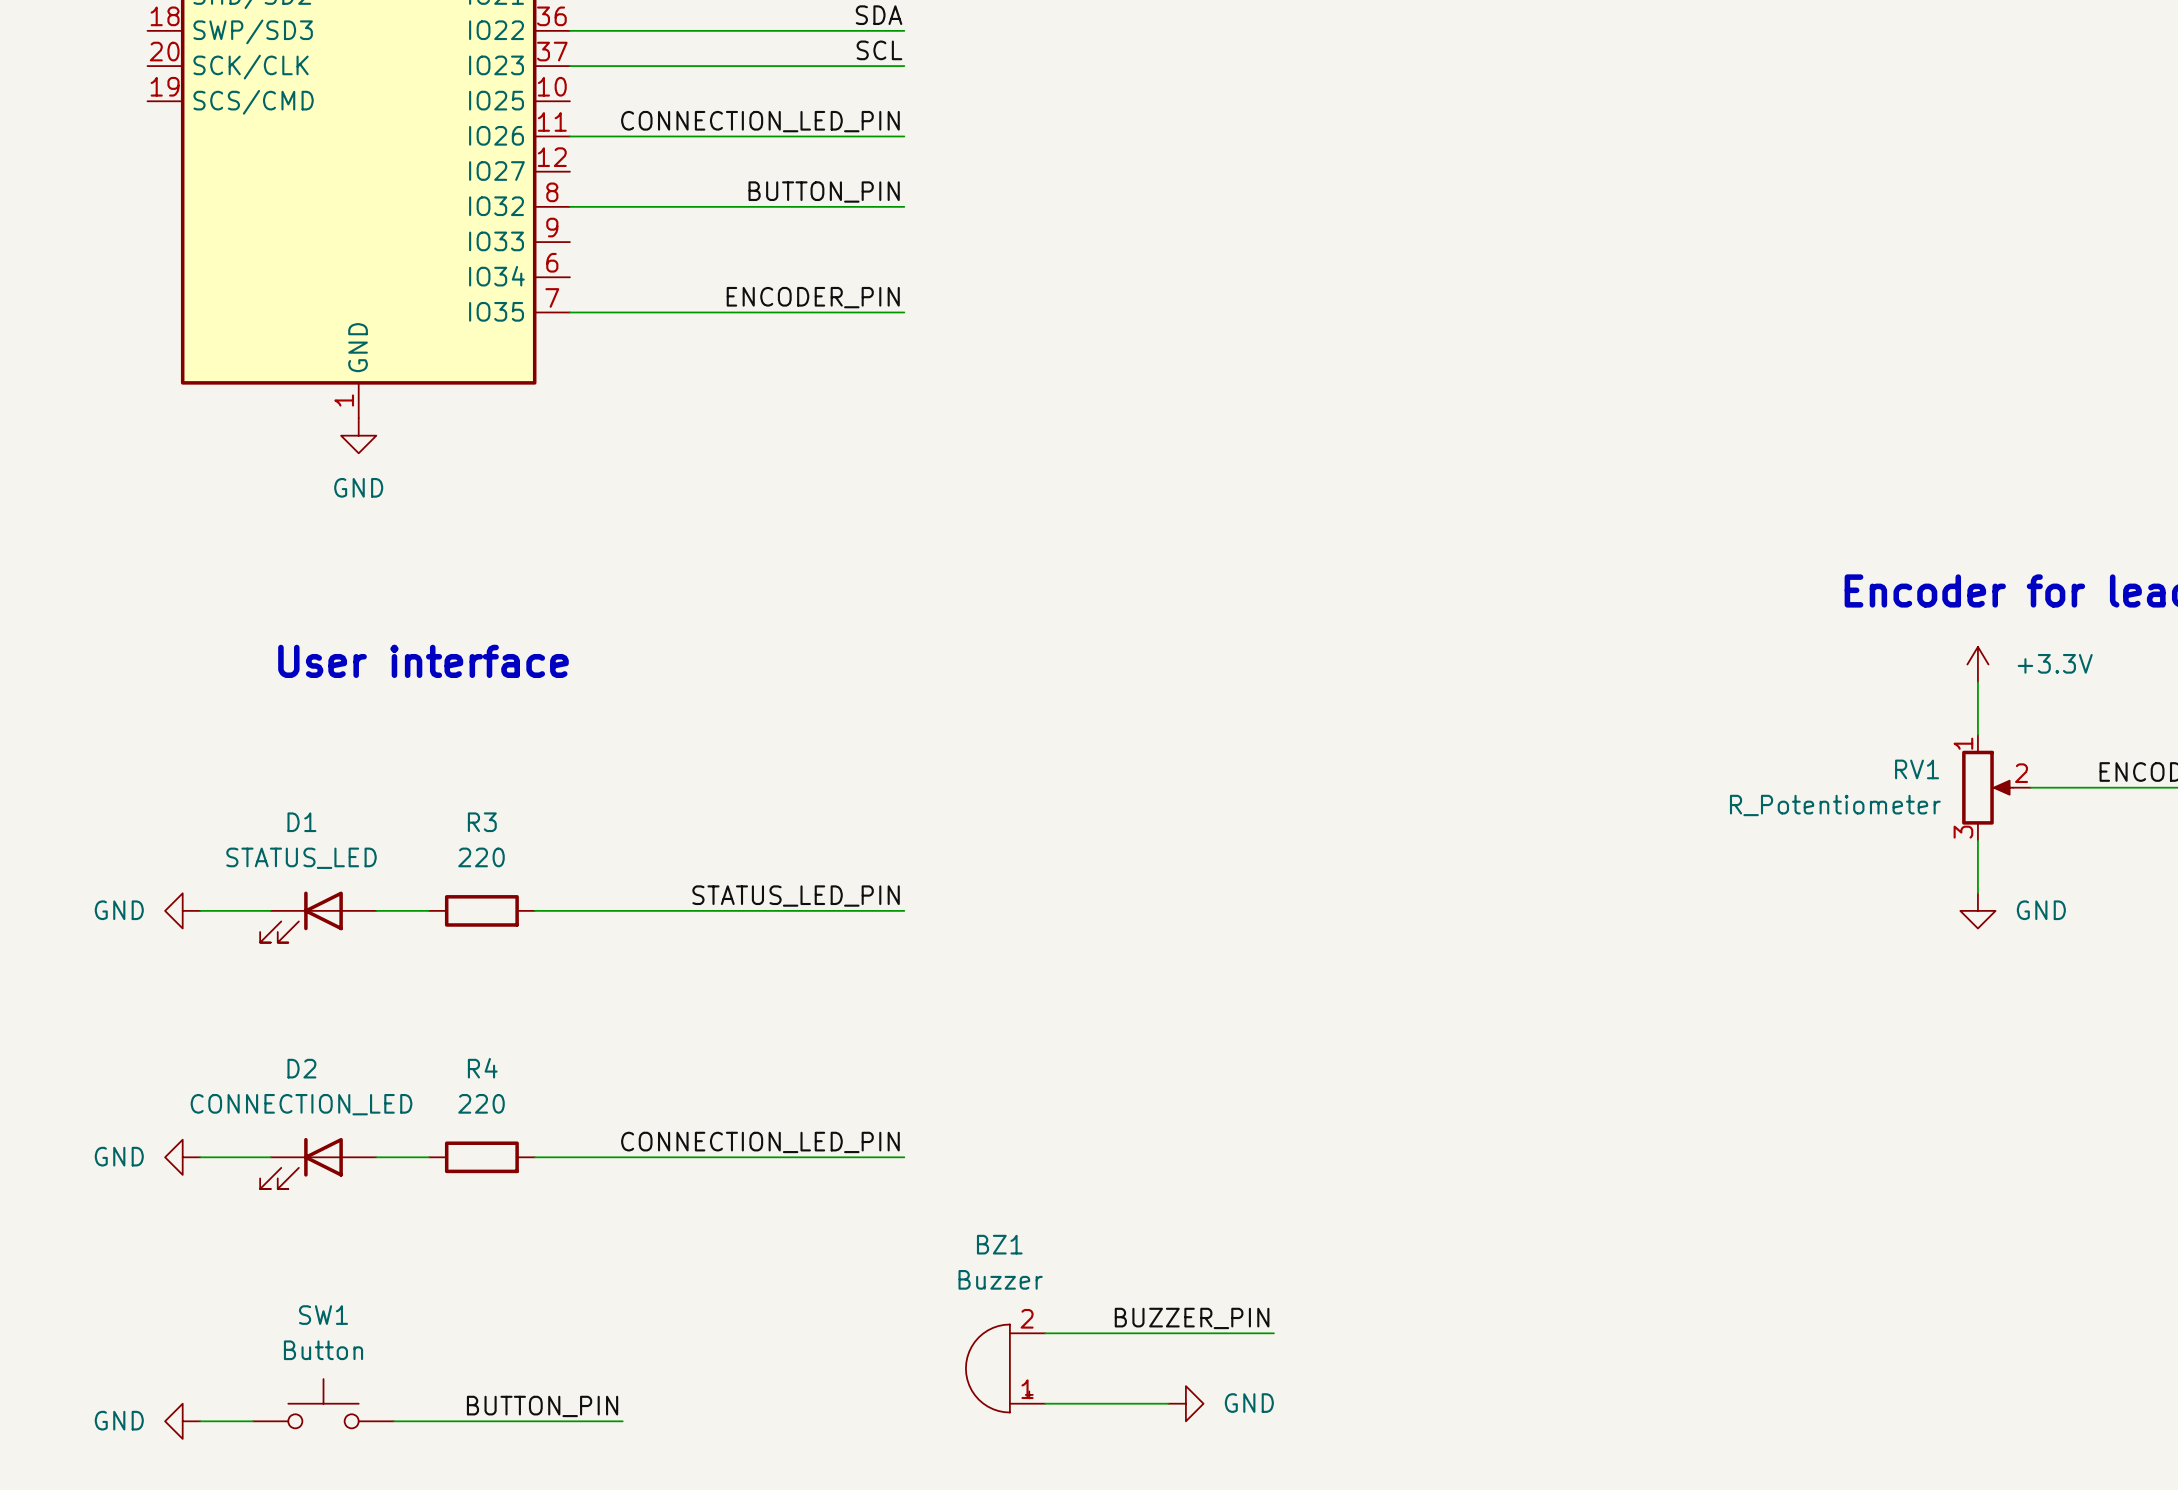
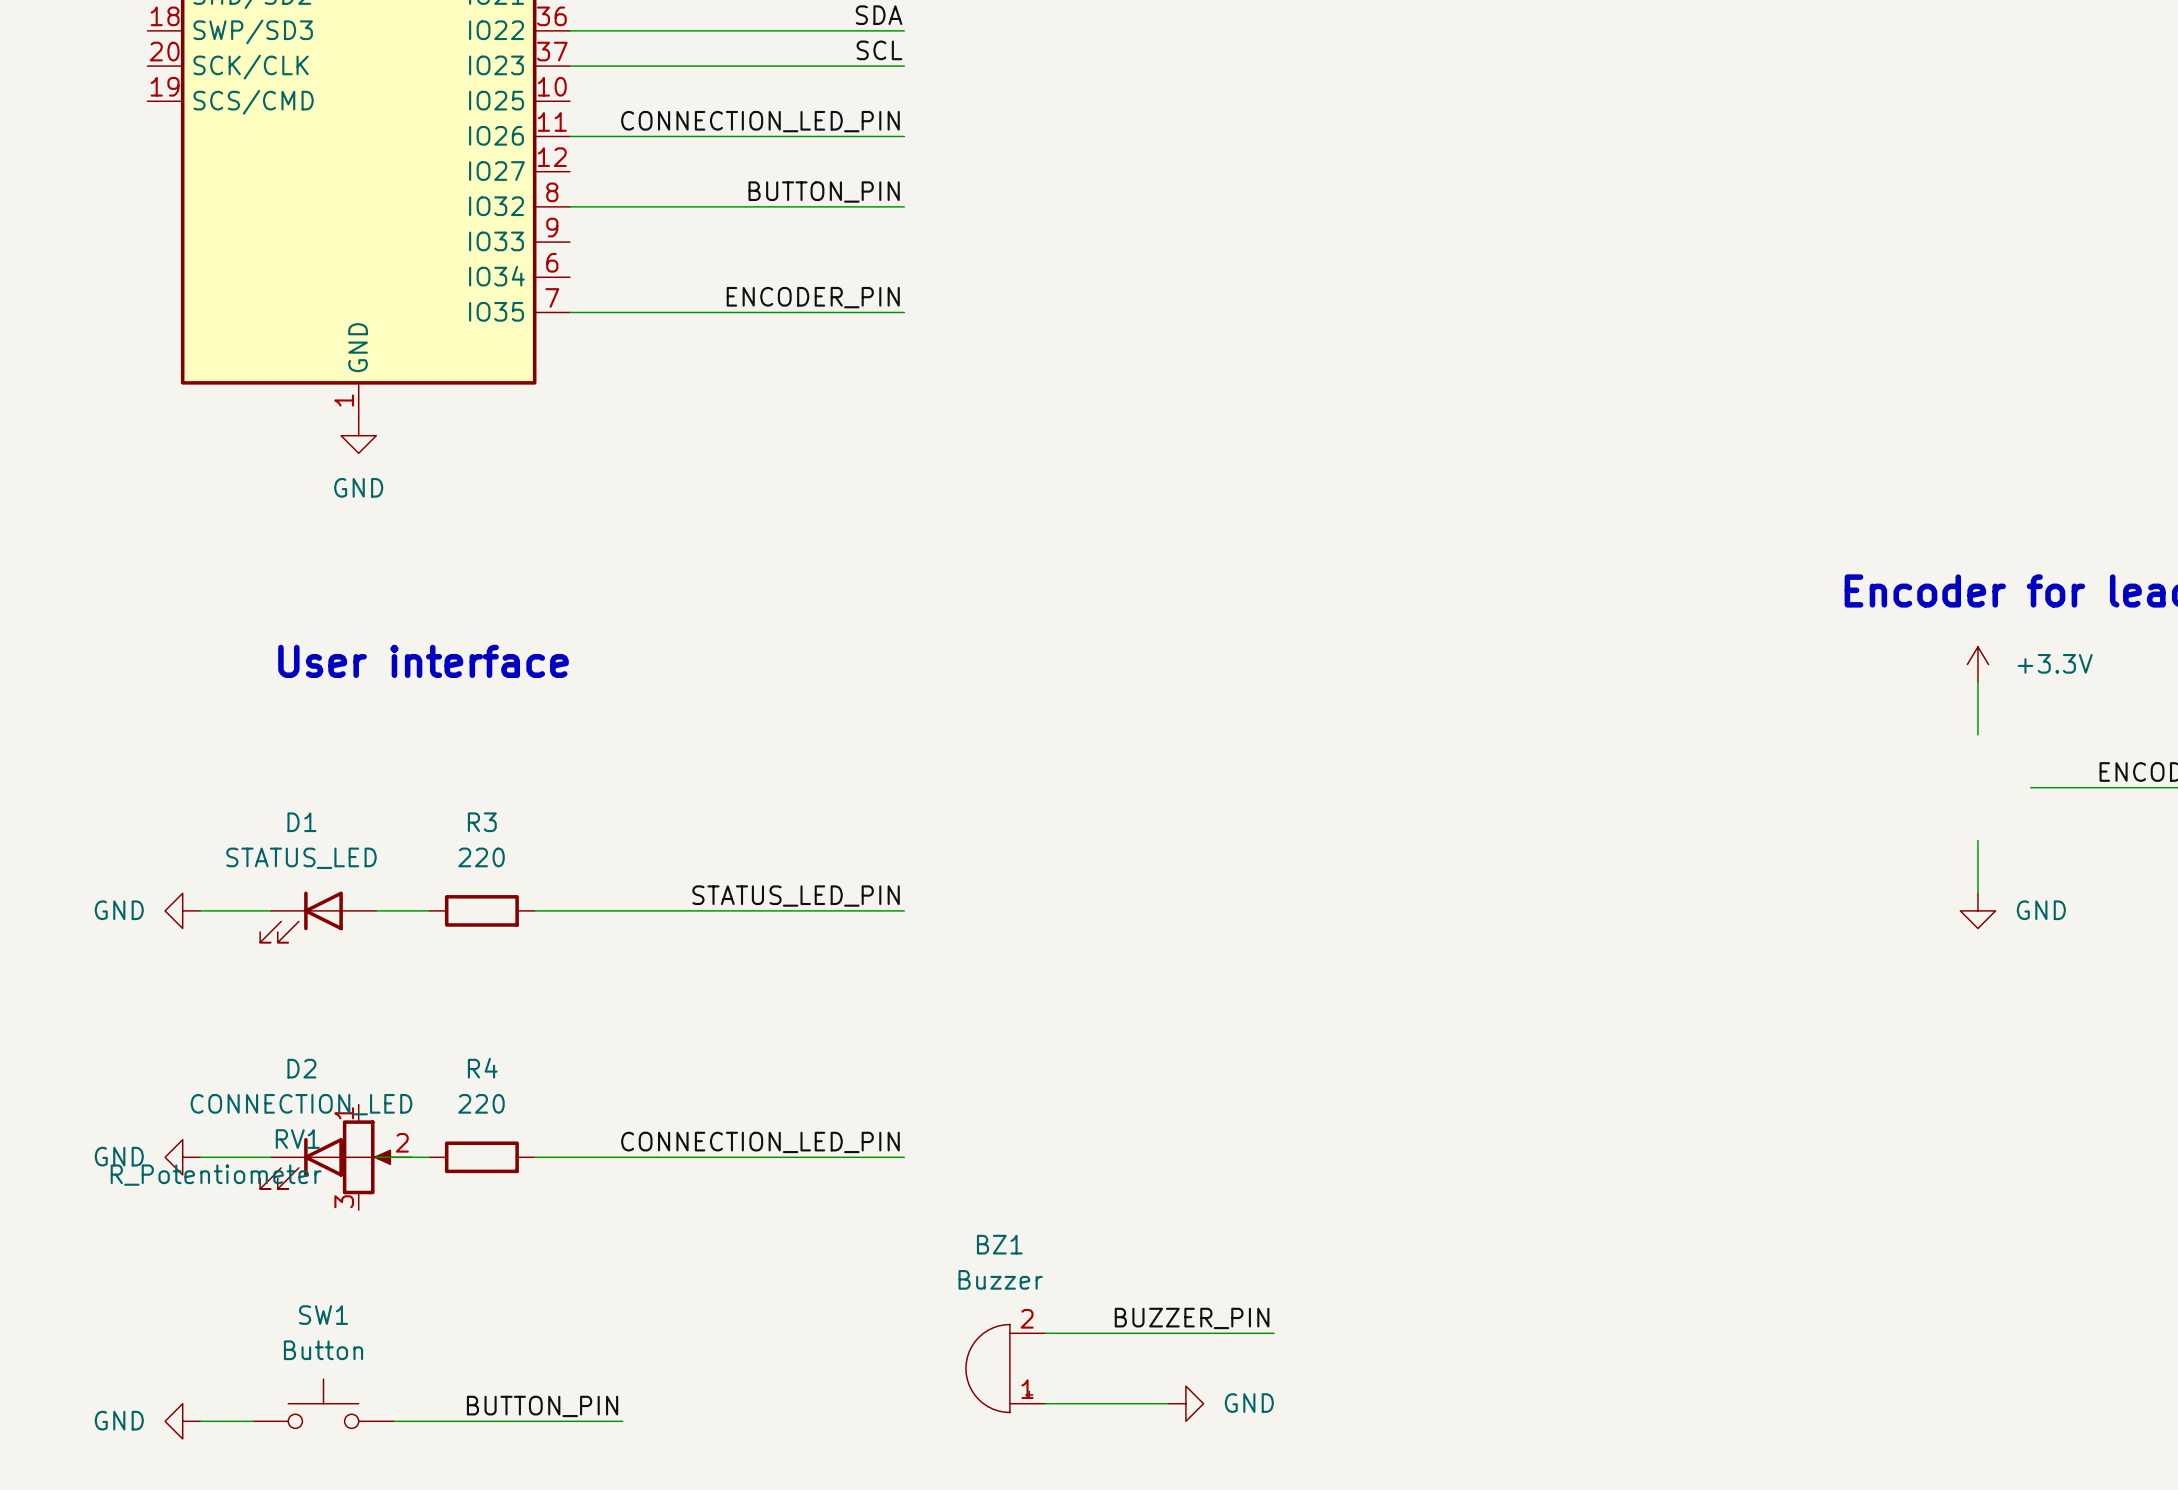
RV1 position: (1996, 787) -> (377, 1157)

